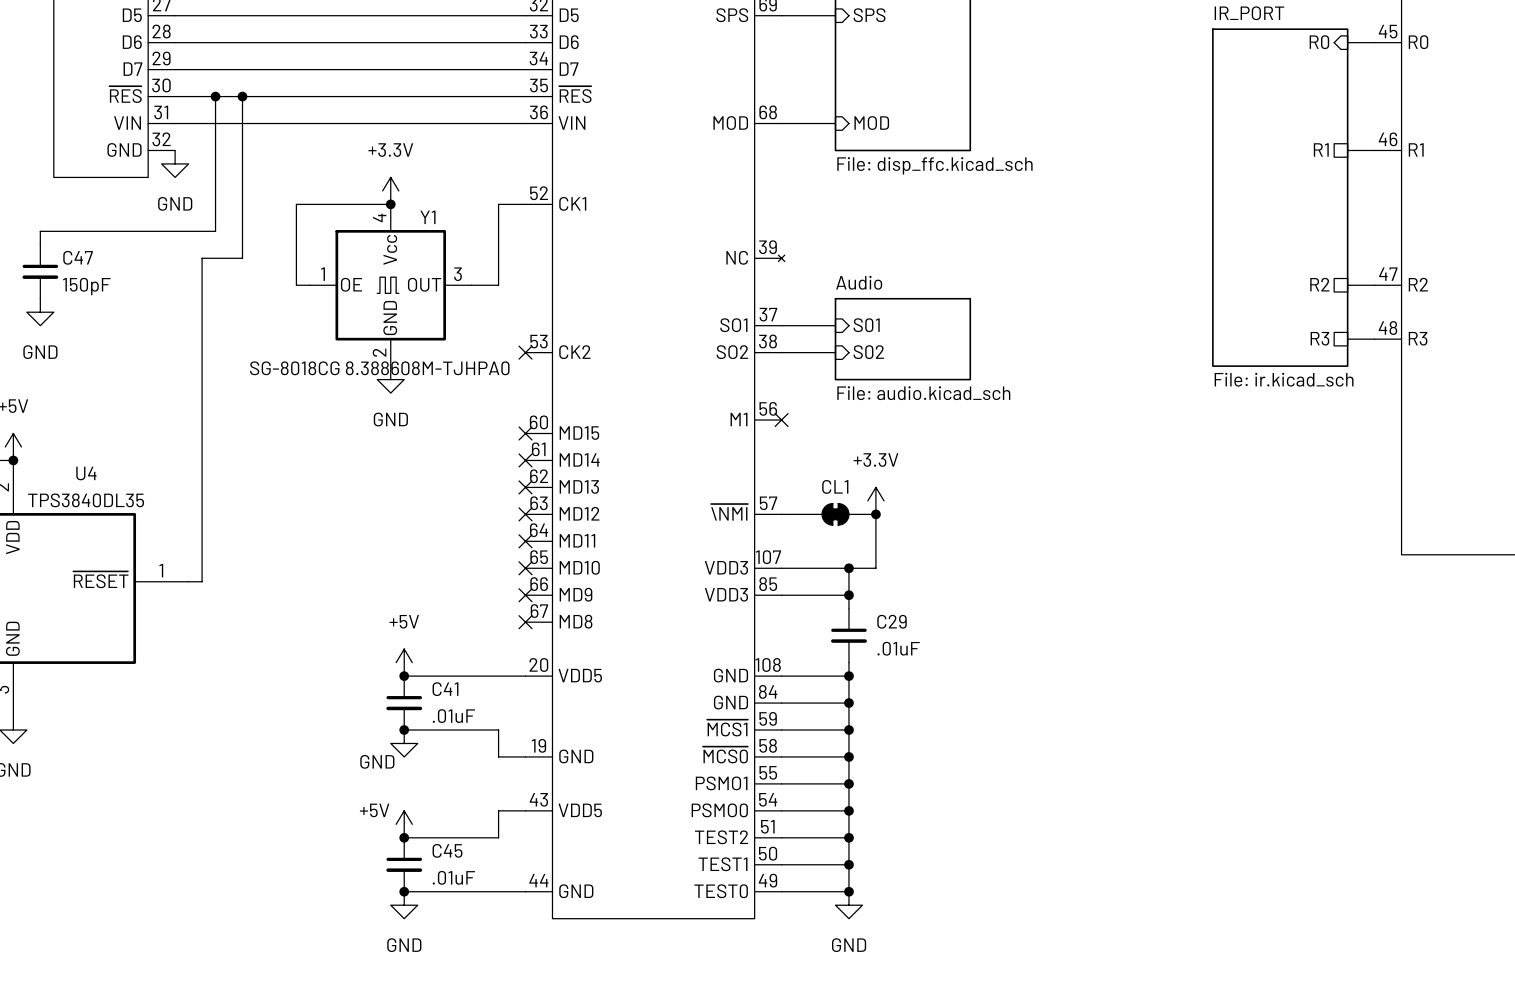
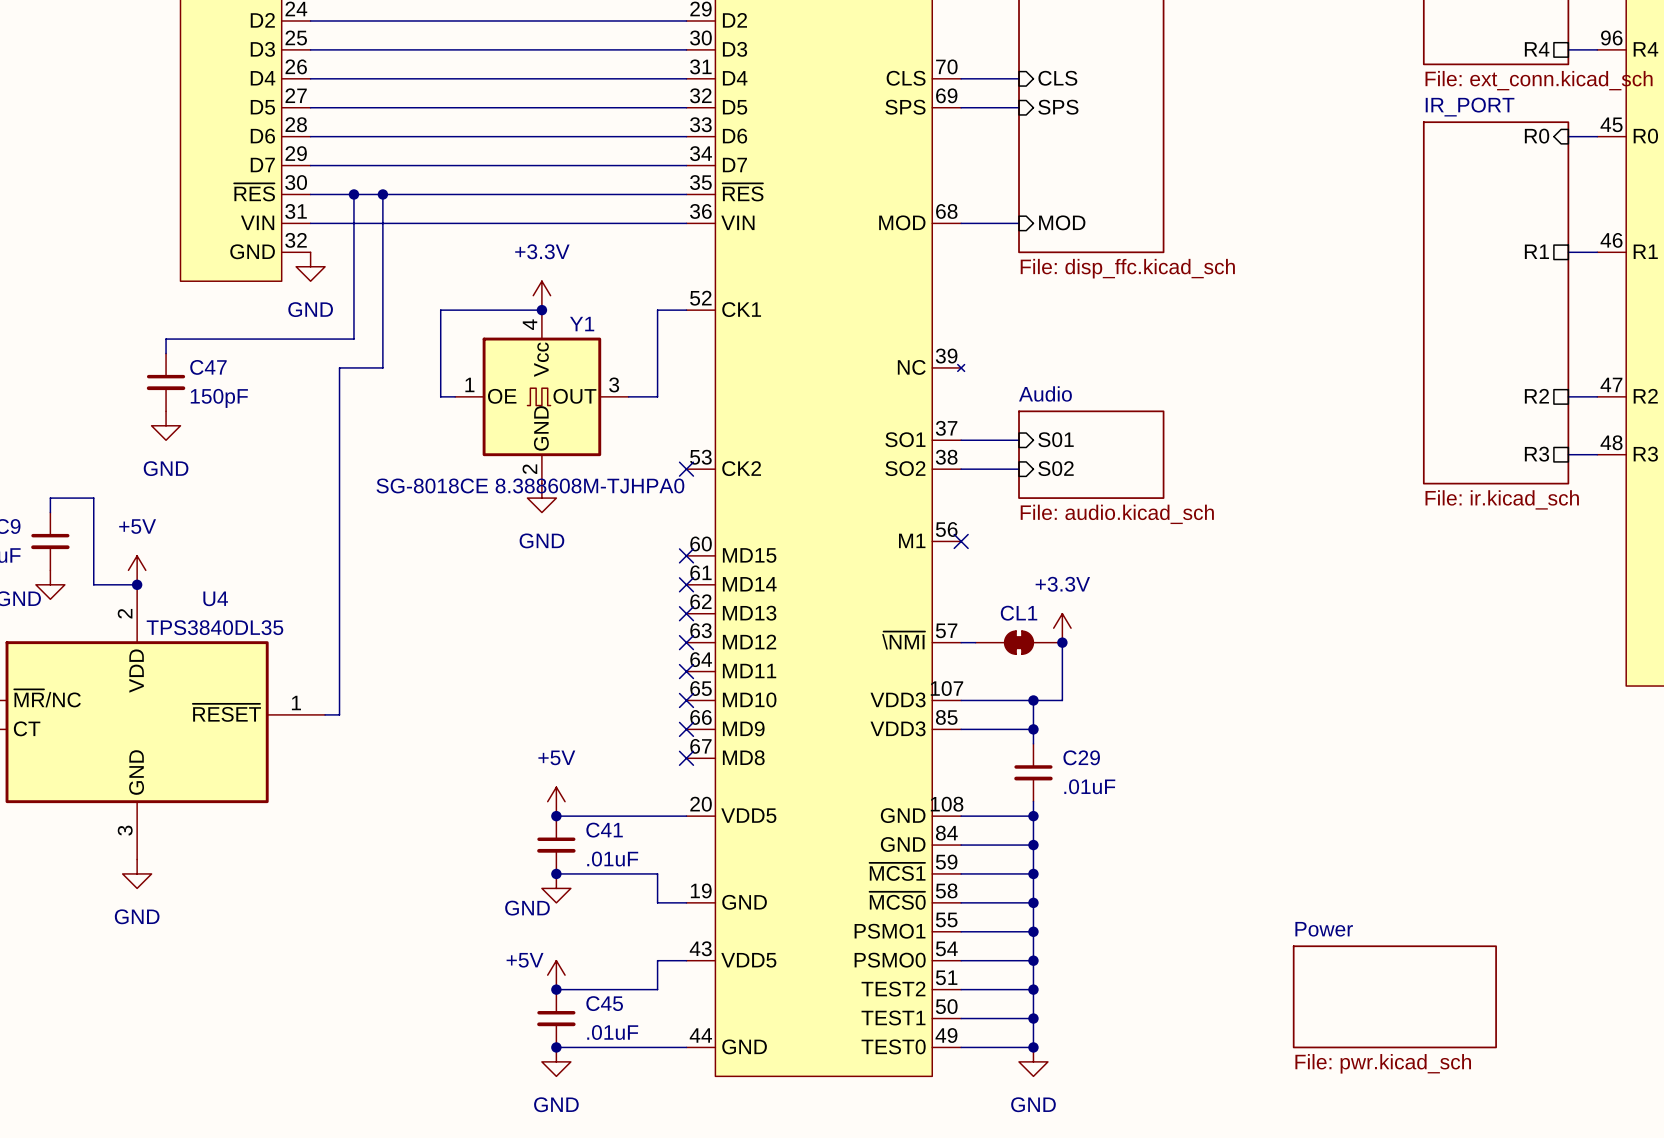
Y1 value: SG-8018CG 8.388608M-TJHPA0 (379, 368) -> SG-8018CE 8.388608M-TJHPA0 (530, 485)
sheet Power: none -> File: pwr.kicad_sch (1394, 996)

